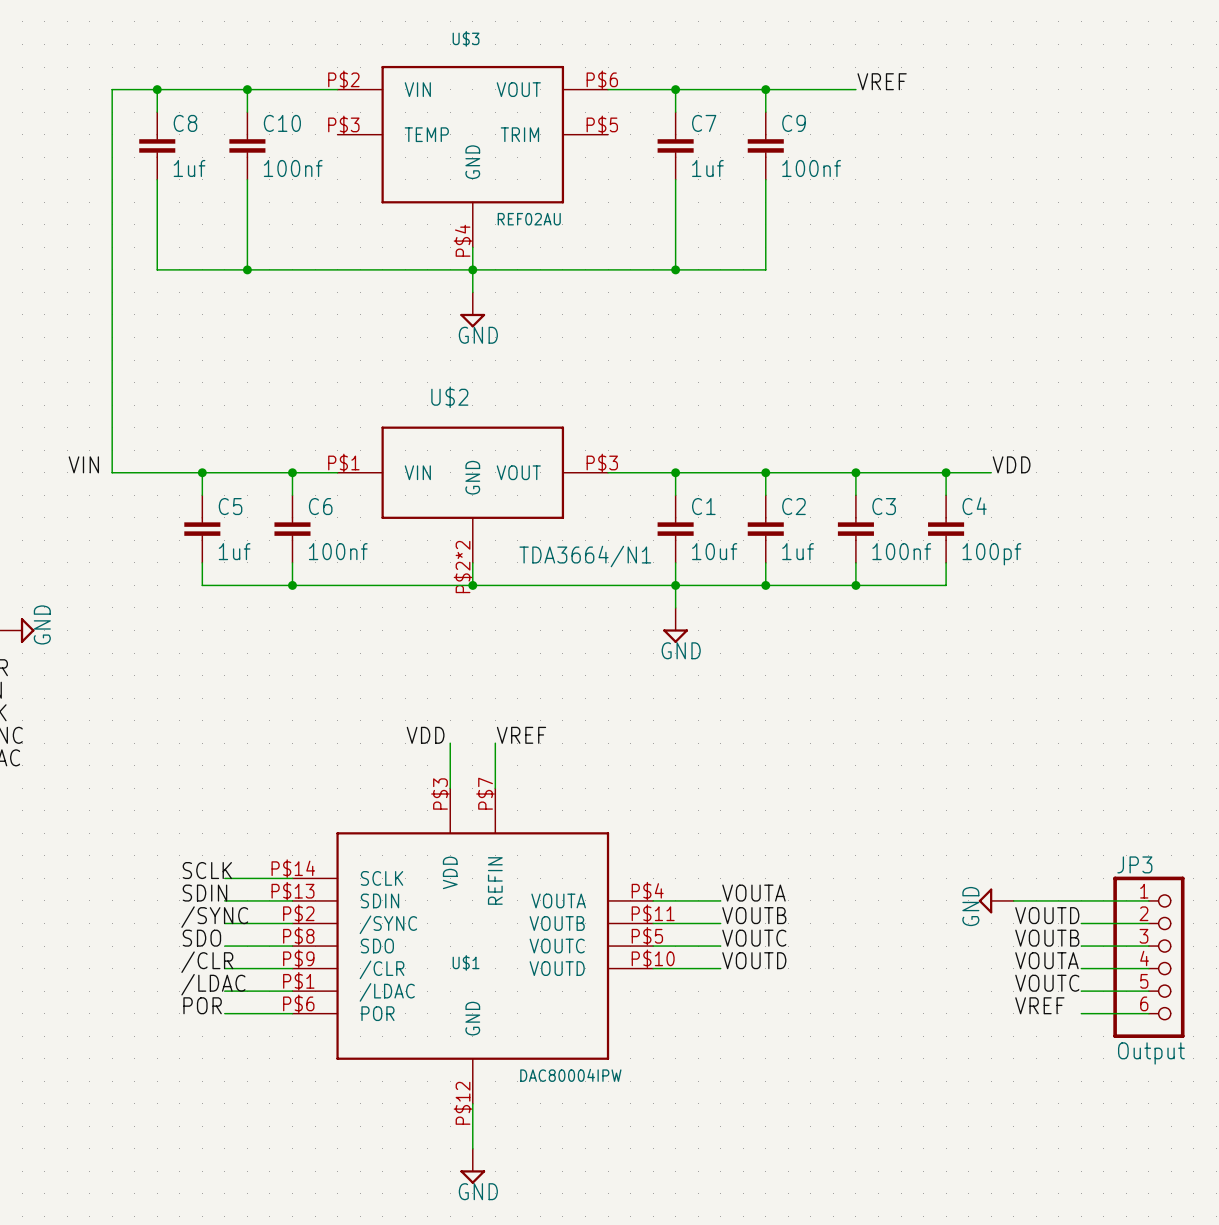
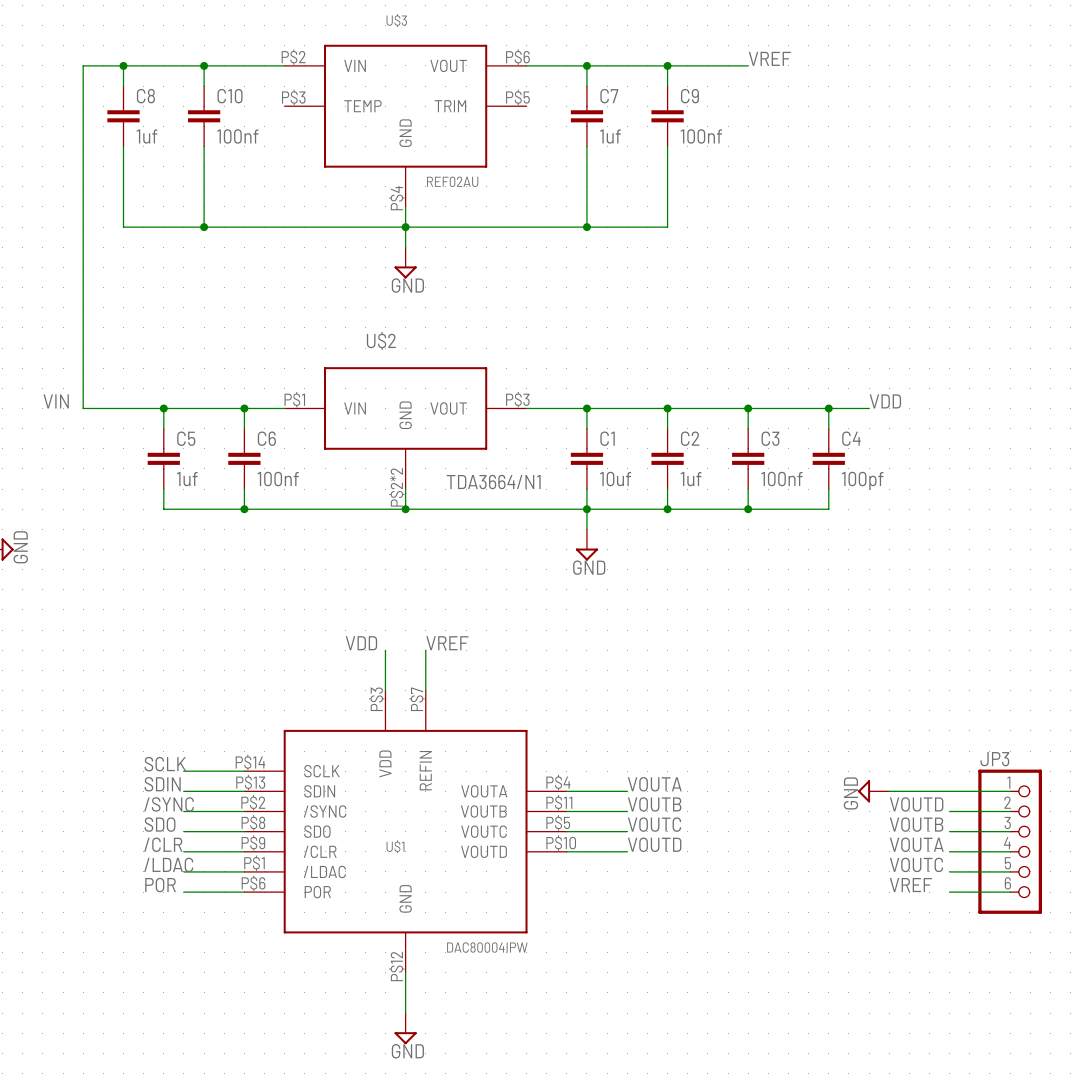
JP3 value: Output (1151, 1053) -> none

